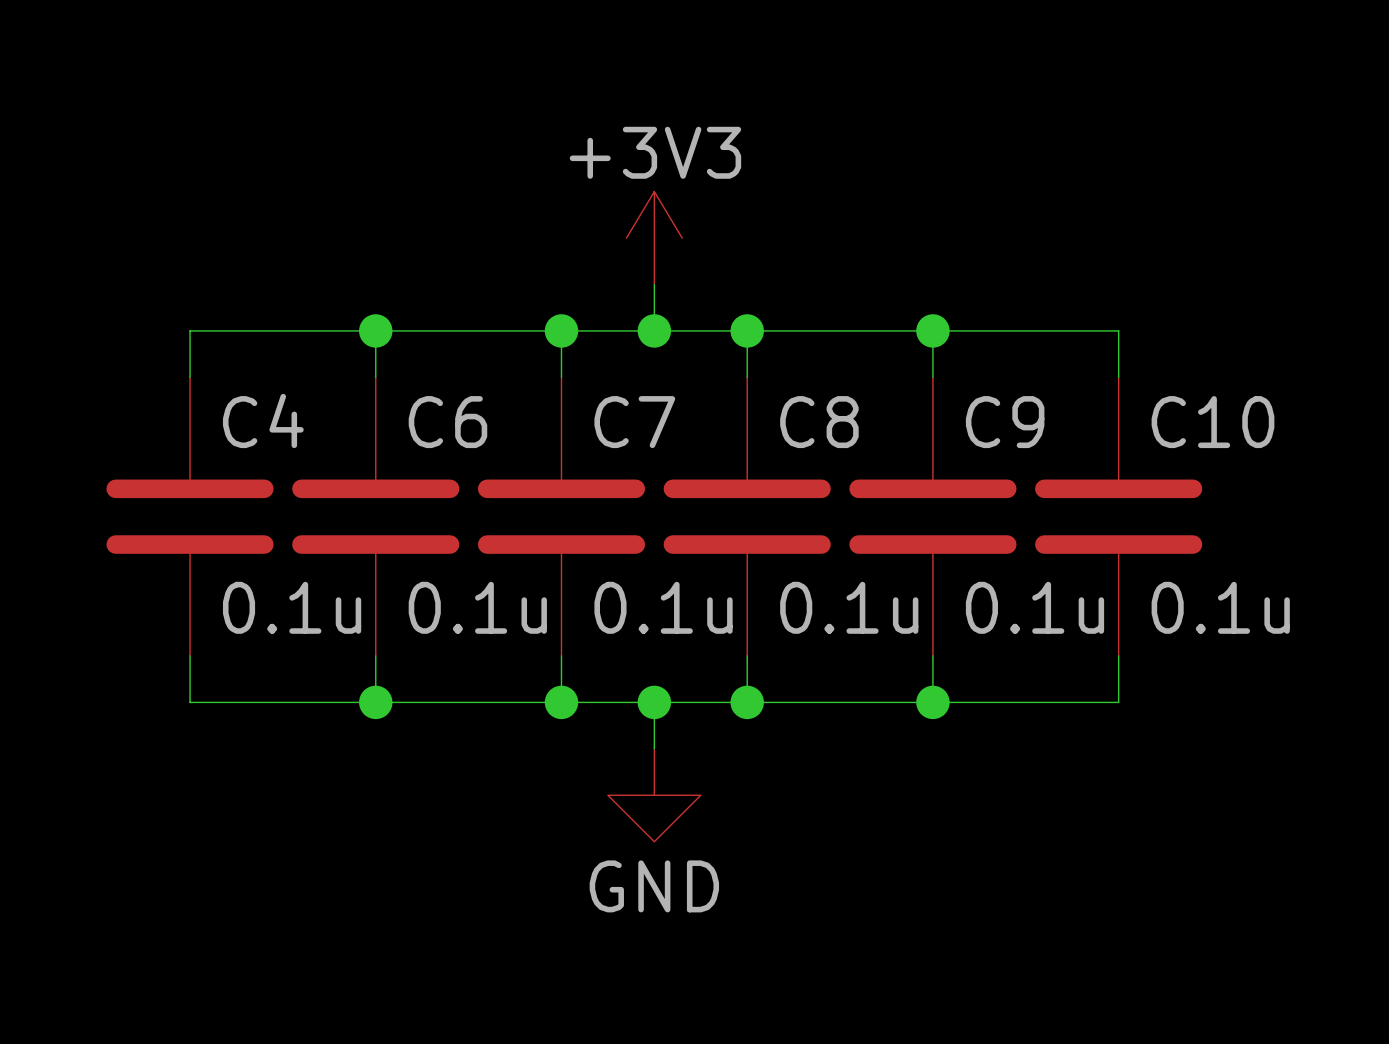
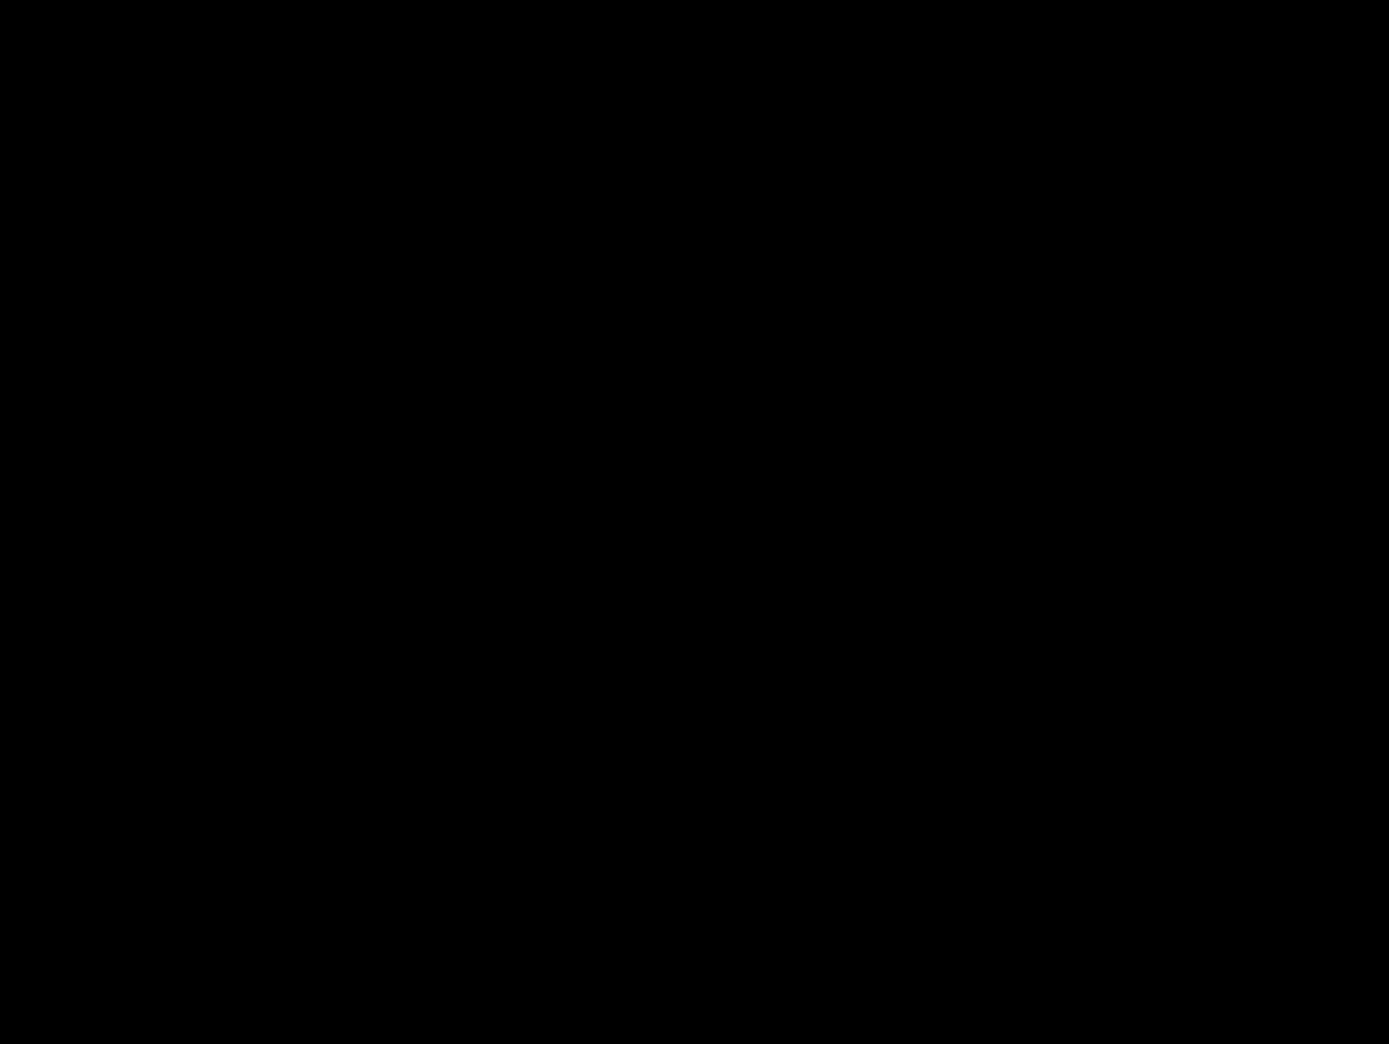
power symbol: +3V3 (654, 238) -> none
wire: (654, 284) (654, 330) -> none
wire: (375, 330) (375, 377) -> none
junction: (375, 330) -> none
wire: (561, 330) (561, 377) -> none
junction: (561, 330) -> none
junction: (654, 330) -> none
wire: (747, 330) (747, 377) -> none
junction: (747, 330) -> none
wire: (932, 330) (932, 377) -> none
junction: (932, 330) -> none
wire: (190, 377) (190, 330) (1118, 330) (1118, 377) -> none
C4: 0.1u (190, 516) -> none
C6: 0.1u (375, 516) -> none
C7: 0.1u (561, 516) -> none
C8: 0.1u (747, 516) -> none
C9: 0.1u (932, 516) -> none
C10: 0.1u (1118, 516) -> none
wire: (190, 655) (190, 702) (1118, 702) (1118, 655) -> none
wire: (375, 655) (375, 702) -> none
wire: (561, 655) (561, 702) -> none
wire: (747, 655) (747, 702) -> none
wire: (932, 655) (932, 702) -> none
junction: (375, 702) -> none
junction: (561, 702) -> none
wire: (654, 702) (654, 748) -> none
junction: (654, 702) -> none
junction: (747, 702) -> none
junction: (932, 702) -> none
power symbol: GND (654, 795) -> none

